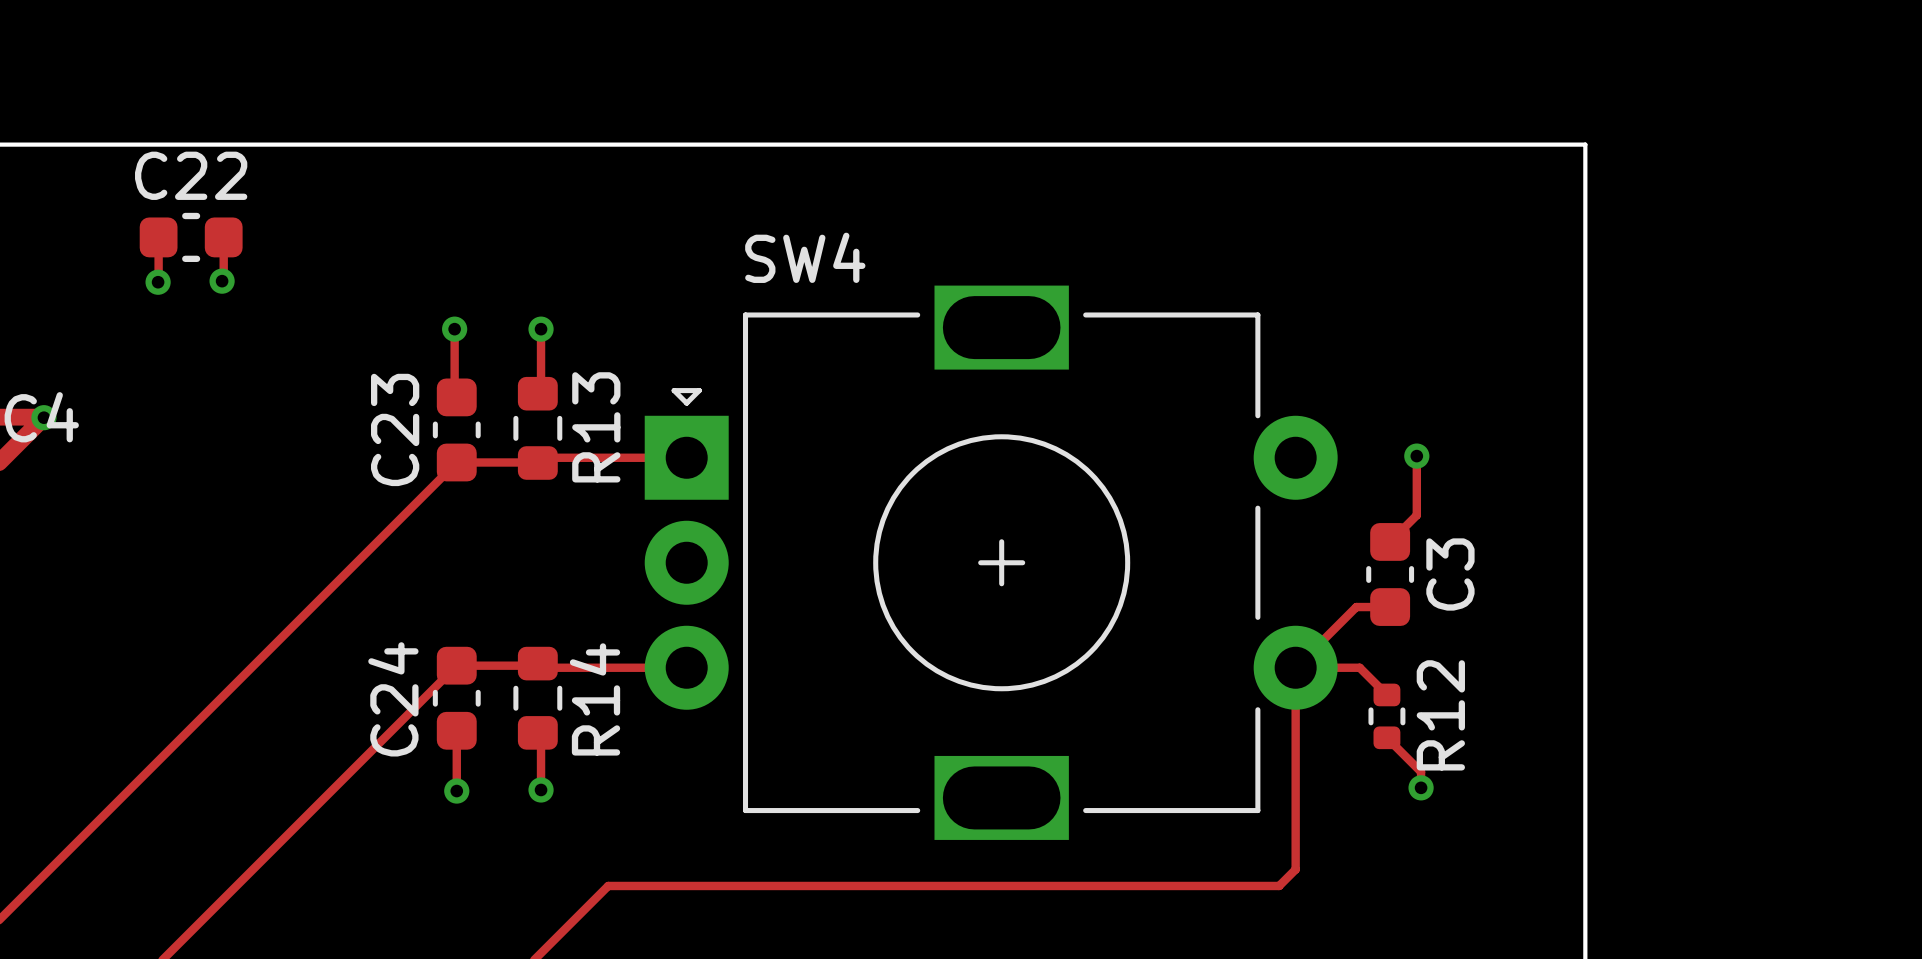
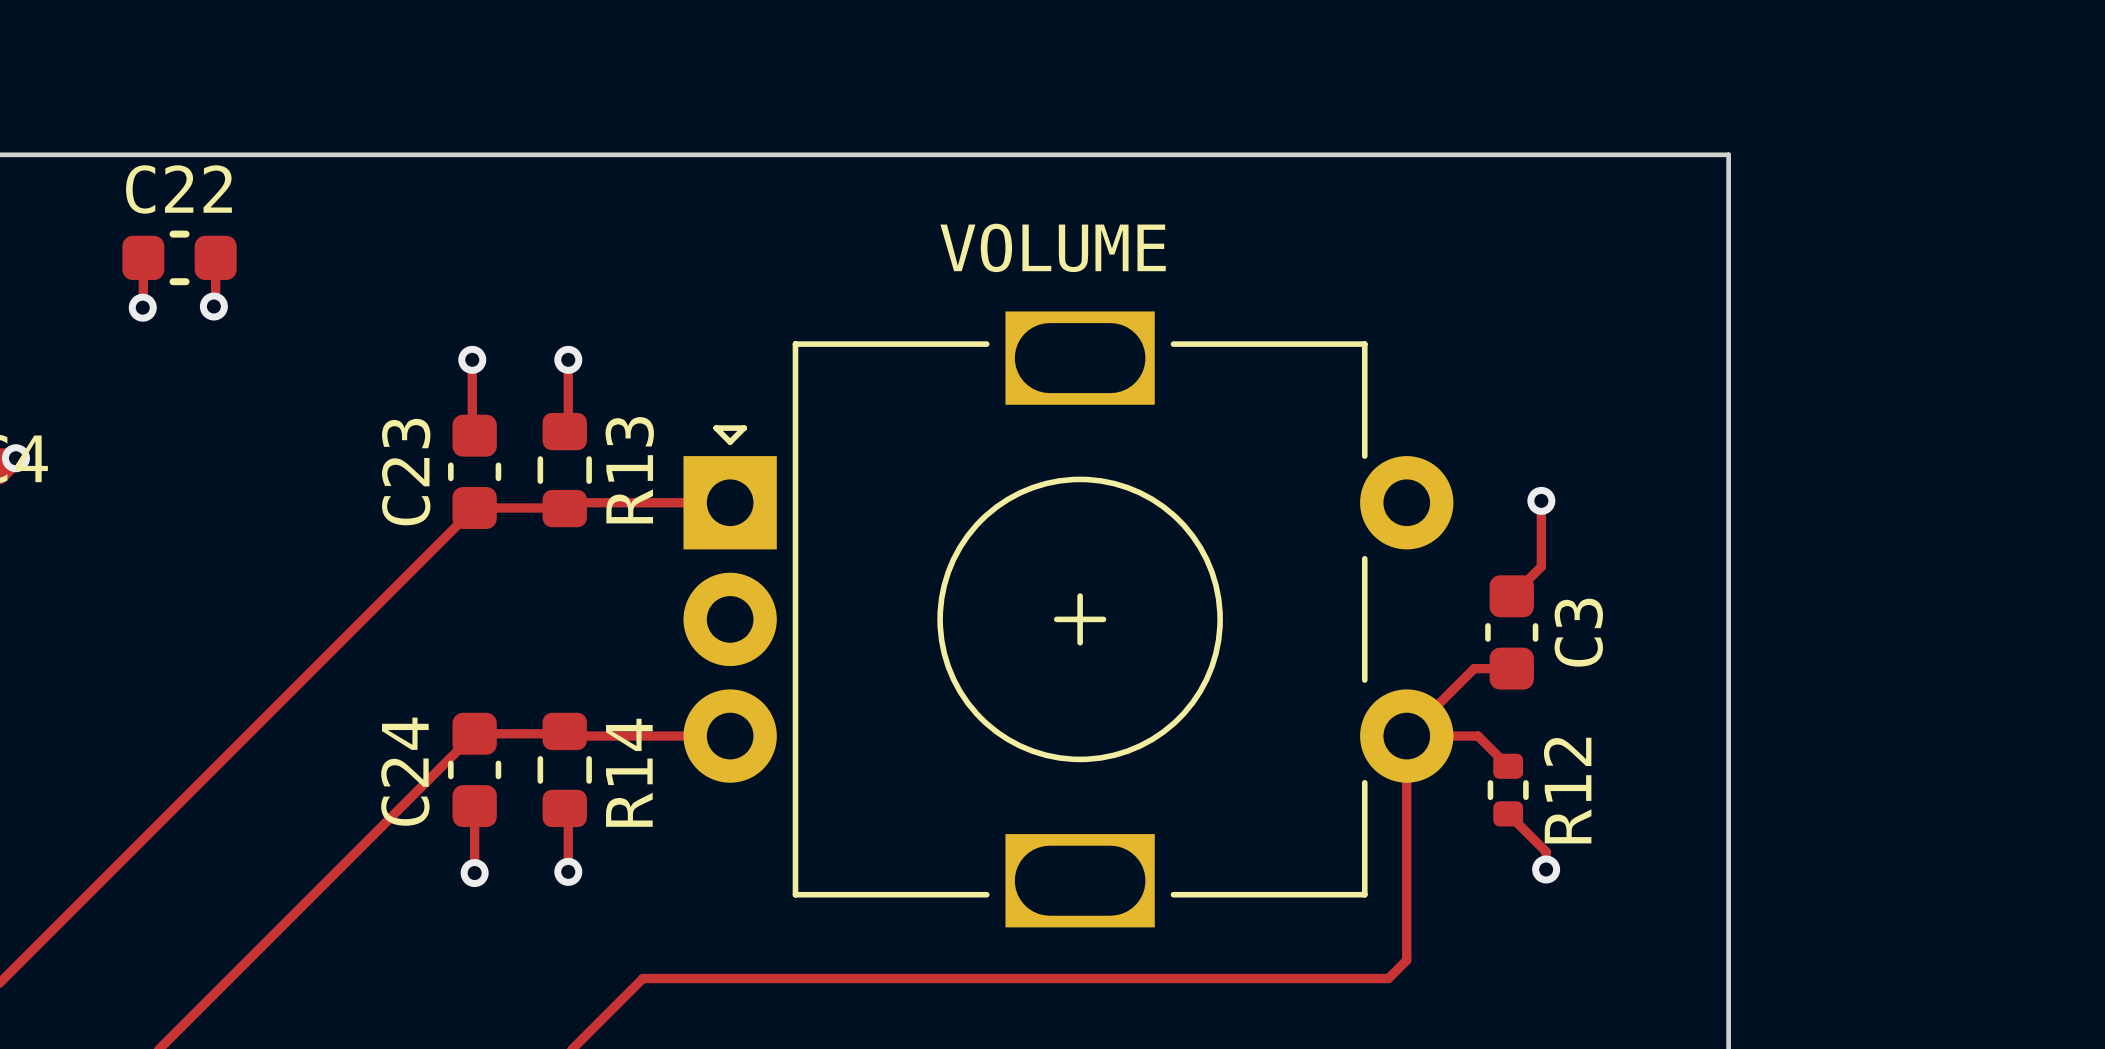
text: none -> VOLUME (1053, 247)
SW4 name: SW4 (805, 257) -> none

